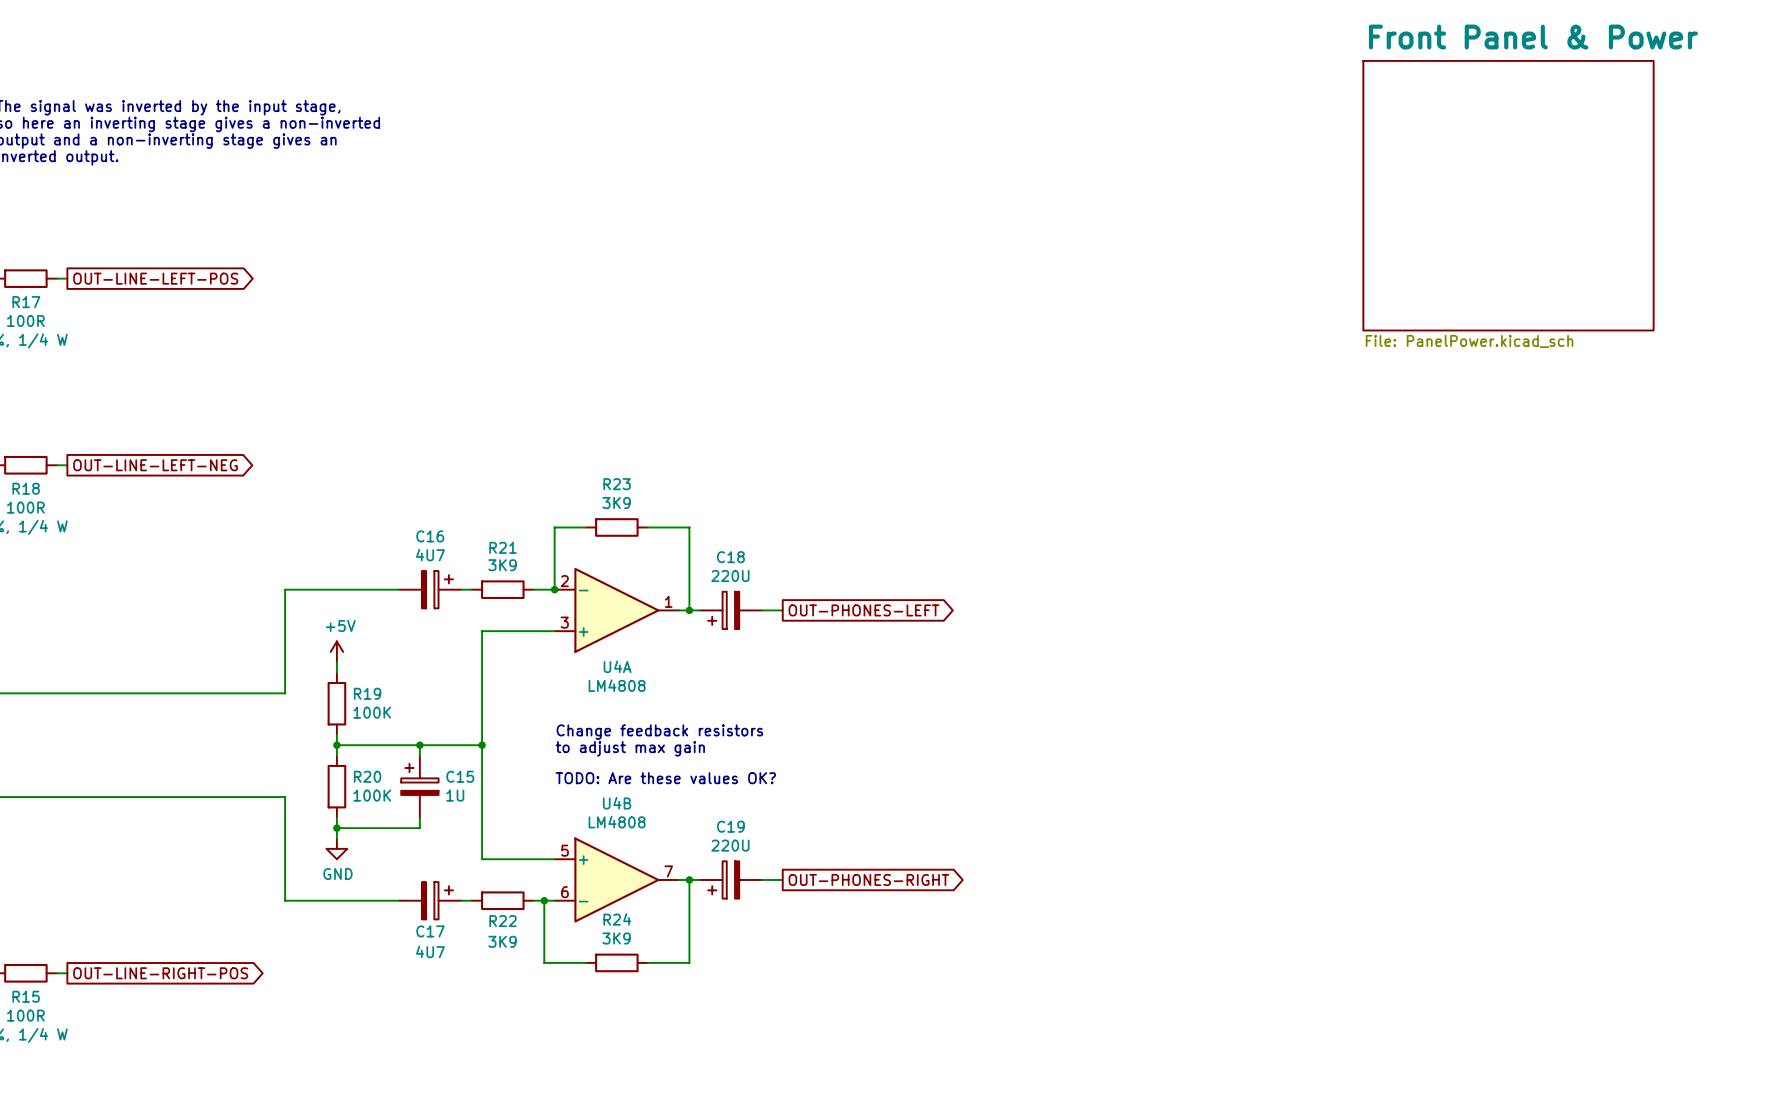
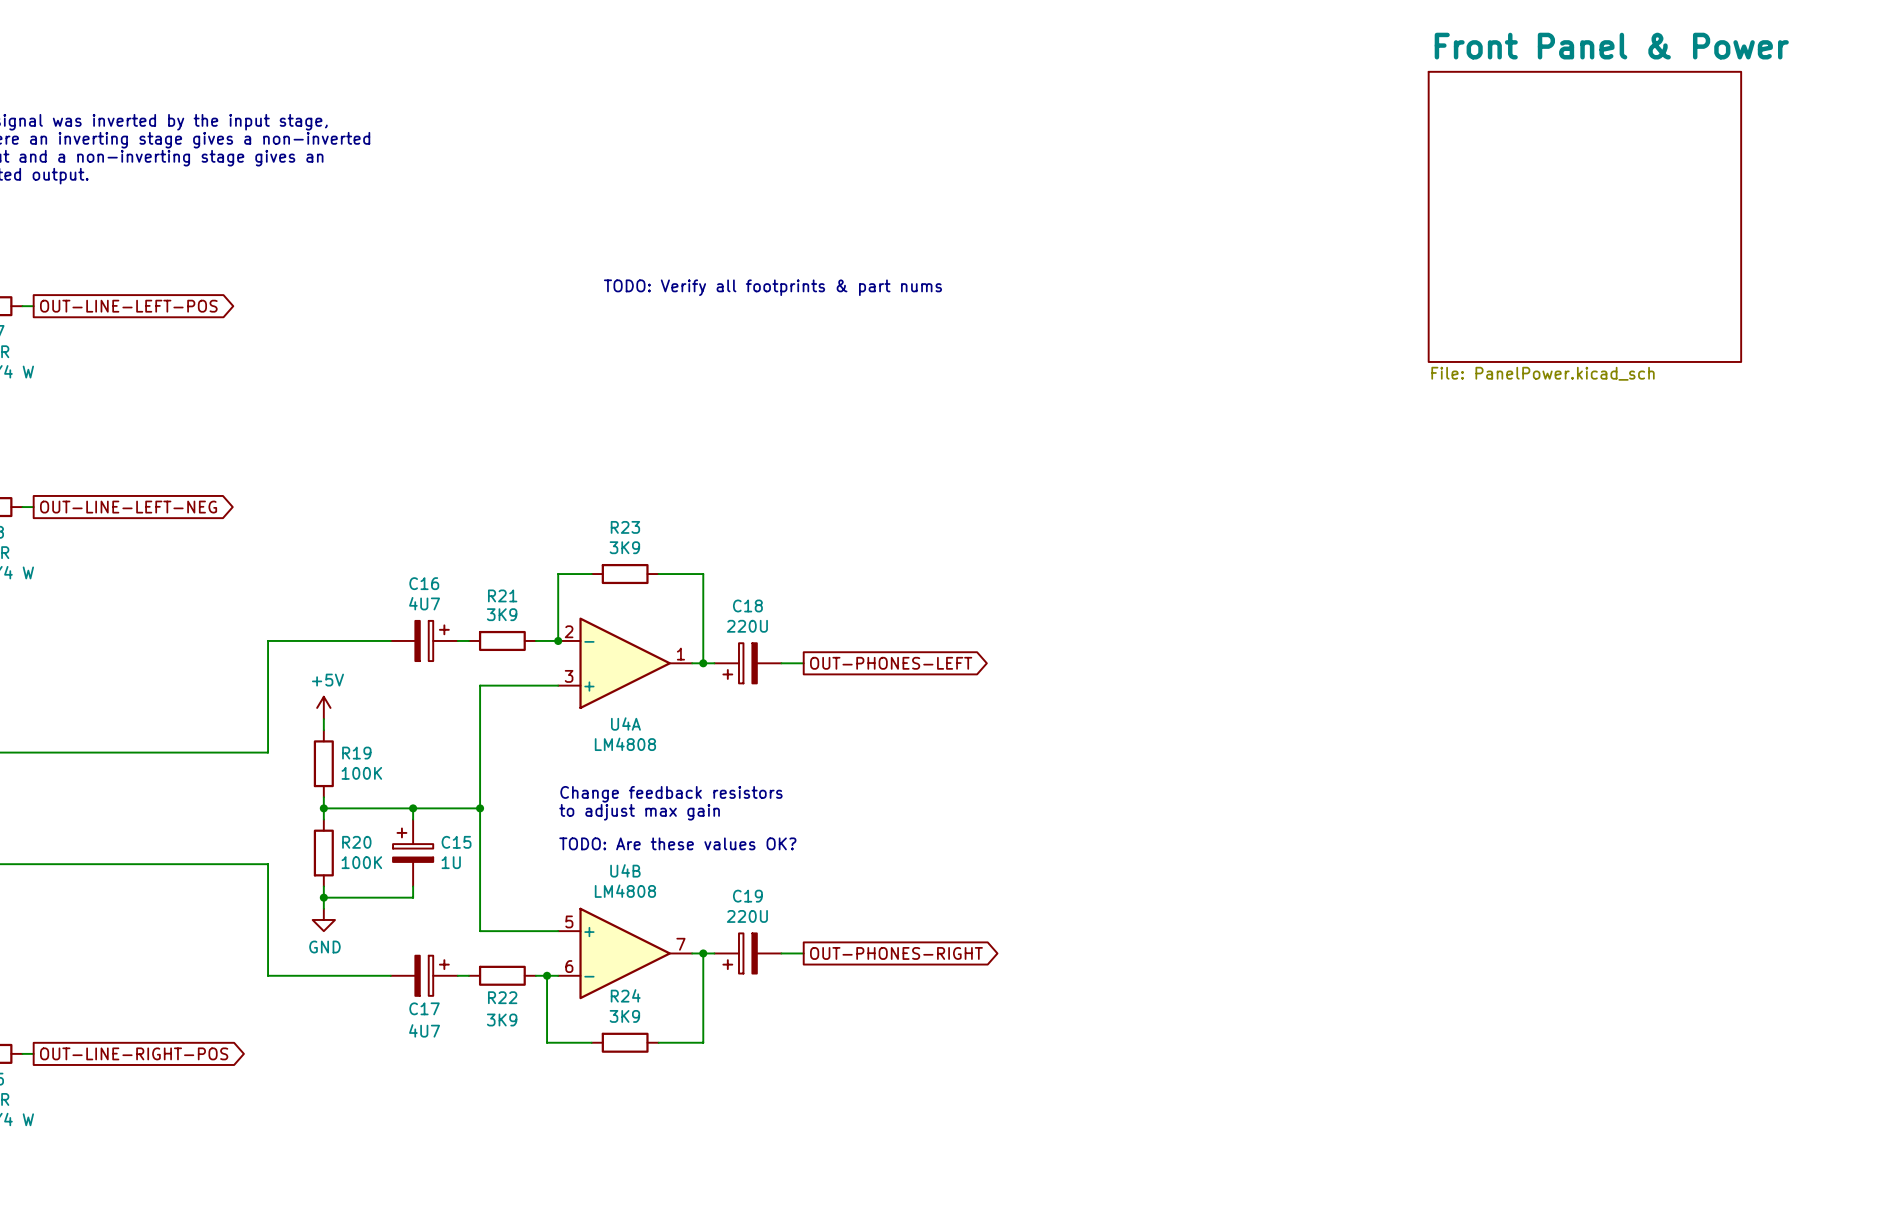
text: none -> TODO: Verify all footprints & part nums (772, 287)

